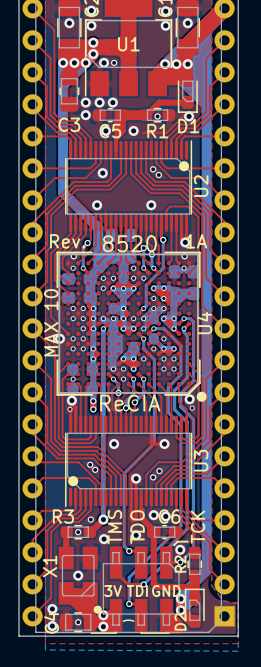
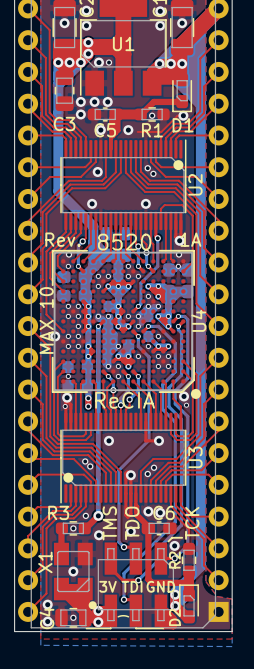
via: none -> (118, 346)

